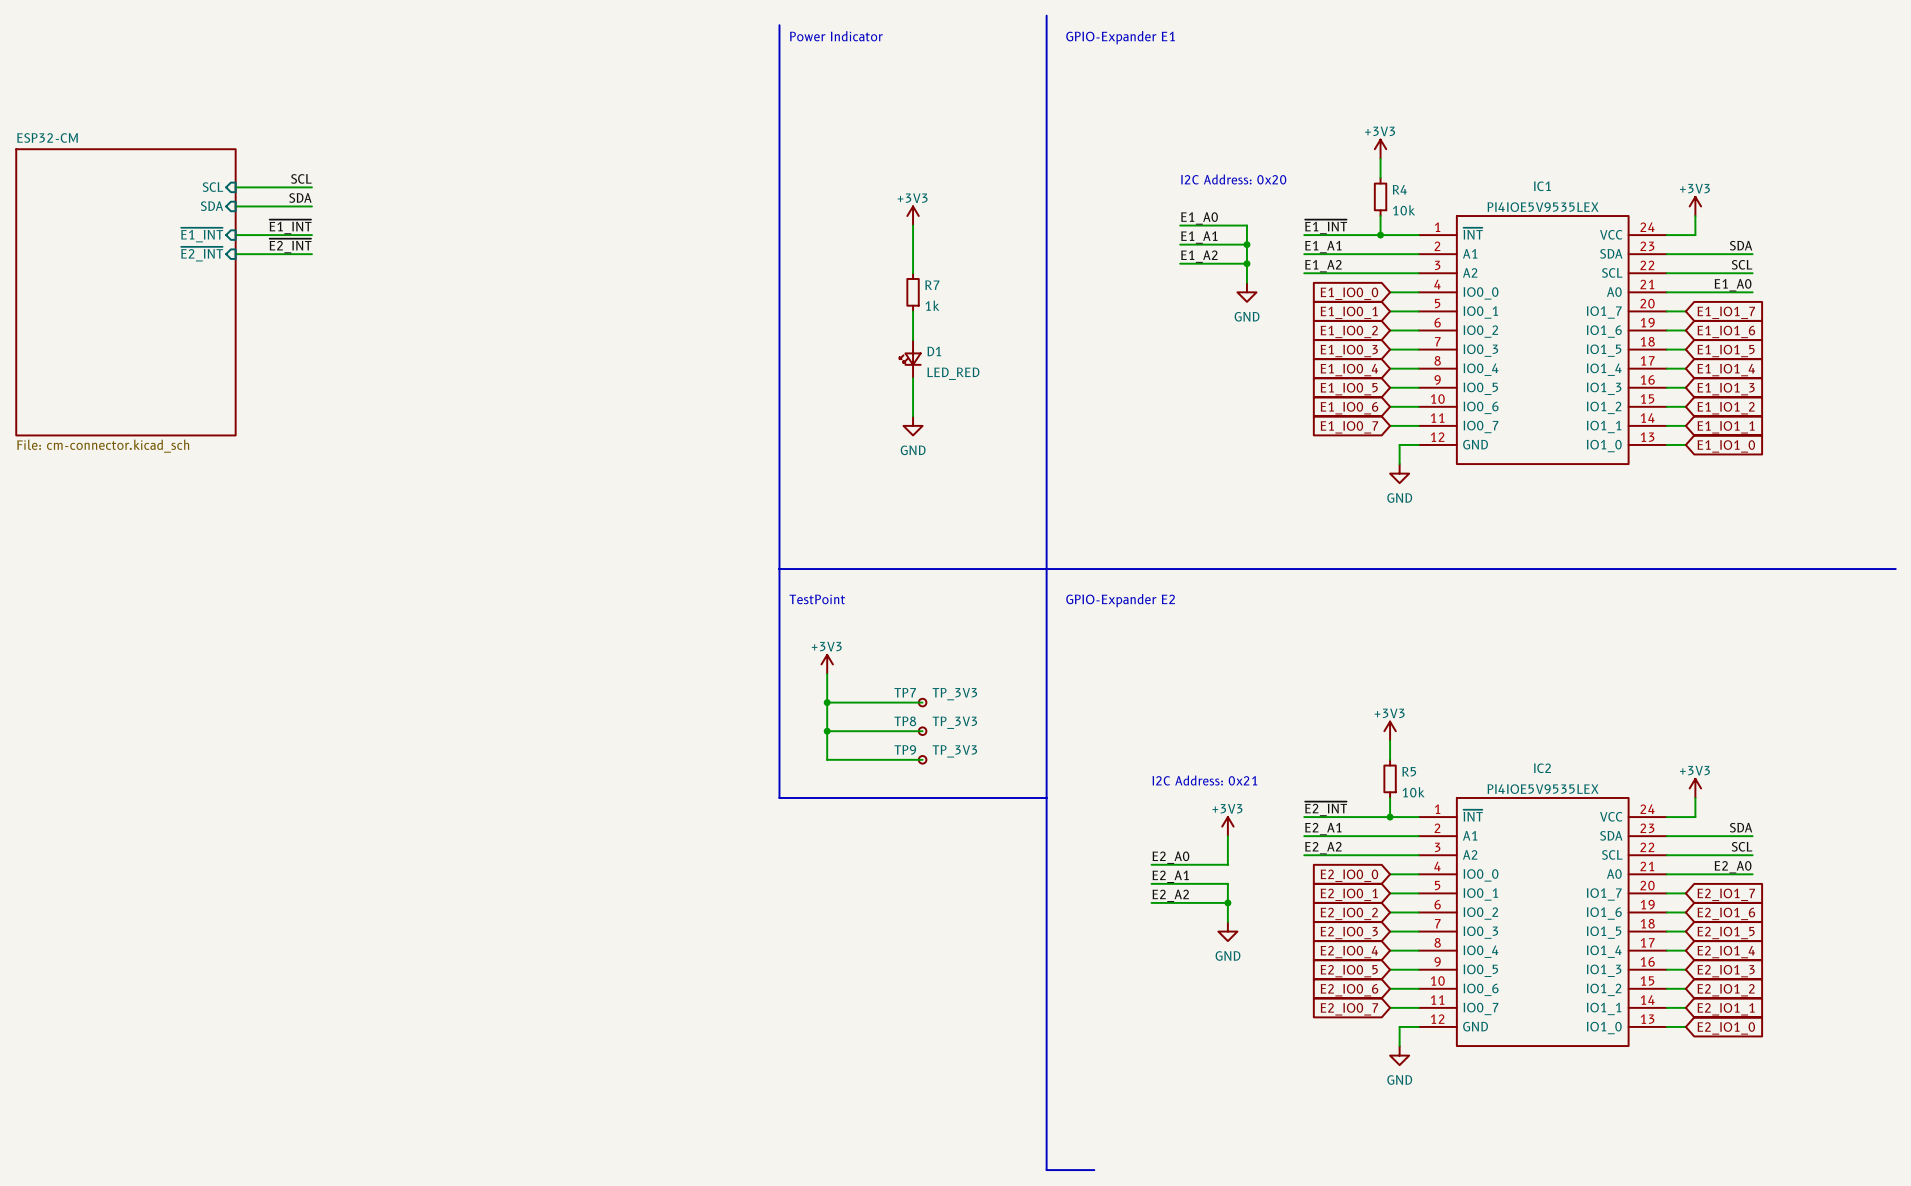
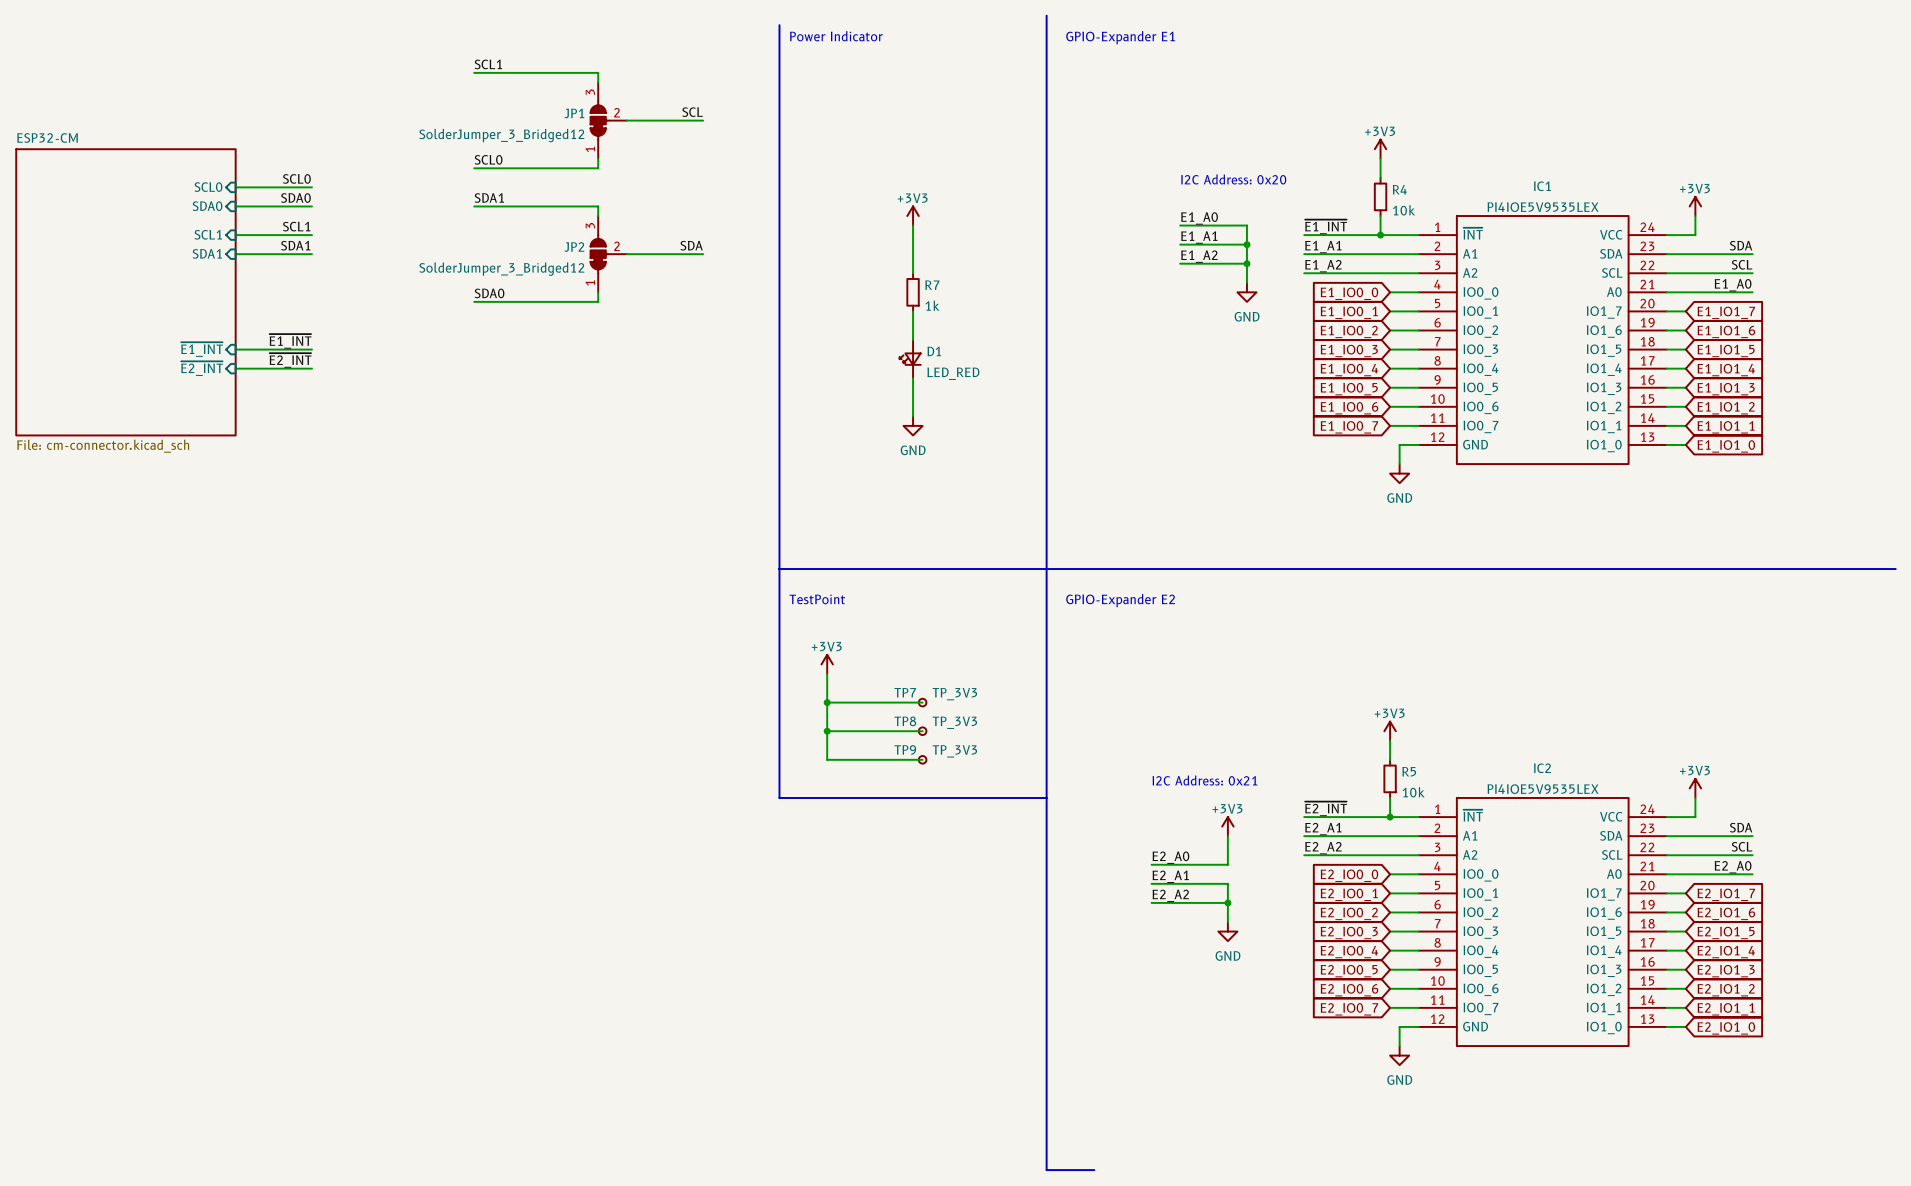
label: none -> SCL1 (488, 64)
wire: none -> (474, 72) (598, 72) (598, 82)
label: none -> SCL (692, 112)
JP1: none -> SolderJumper_3_Bridged12 (608, 120)
wire: none -> (626, 120) (703, 120)
wire: none -> (598, 158) (598, 168) (474, 168)
label: none -> SCL0 (488, 159)
label: SCL (301, 178) -> SCL0 (296, 178)
sheet pin: SCL (212, 187) -> SCL0 (208, 187)
label: SDA (300, 198) -> SDA0 (295, 198)
label: none -> SDA1 (489, 198)
sheet pin: SDA (211, 206) -> SDA0 (207, 206)
wire: none -> (474, 206) (598, 206) (598, 216)
label: ~{E1_INT} (290, 226) -> SCL1 (296, 226)
sheet pin: ~{E1_INT} (202, 235) -> SCL1 (208, 234)
label: ~{E2_INT} (290, 245) -> SDA1 (295, 245)
label: none -> SDA (691, 245)
sheet pin: ~{E2_INT} (202, 254) -> SDA1 (207, 253)
JP2: none -> SolderJumper_3_Bridged12 (608, 254)
wire: none -> (626, 254) (703, 254)
wire: none -> (598, 292) (598, 301) (474, 301)
label: none -> SDA0 (489, 293)
label: none -> ~{E1_INT} (290, 341)
sheet pin: none -> ~{E1_INT} (202, 349)
wire: none -> (235, 349) (311, 349)
label: none -> ~{E2_INT} (290, 360)
sheet pin: none -> ~{E2_INT} (202, 368)
wire: none -> (235, 368) (311, 368)

